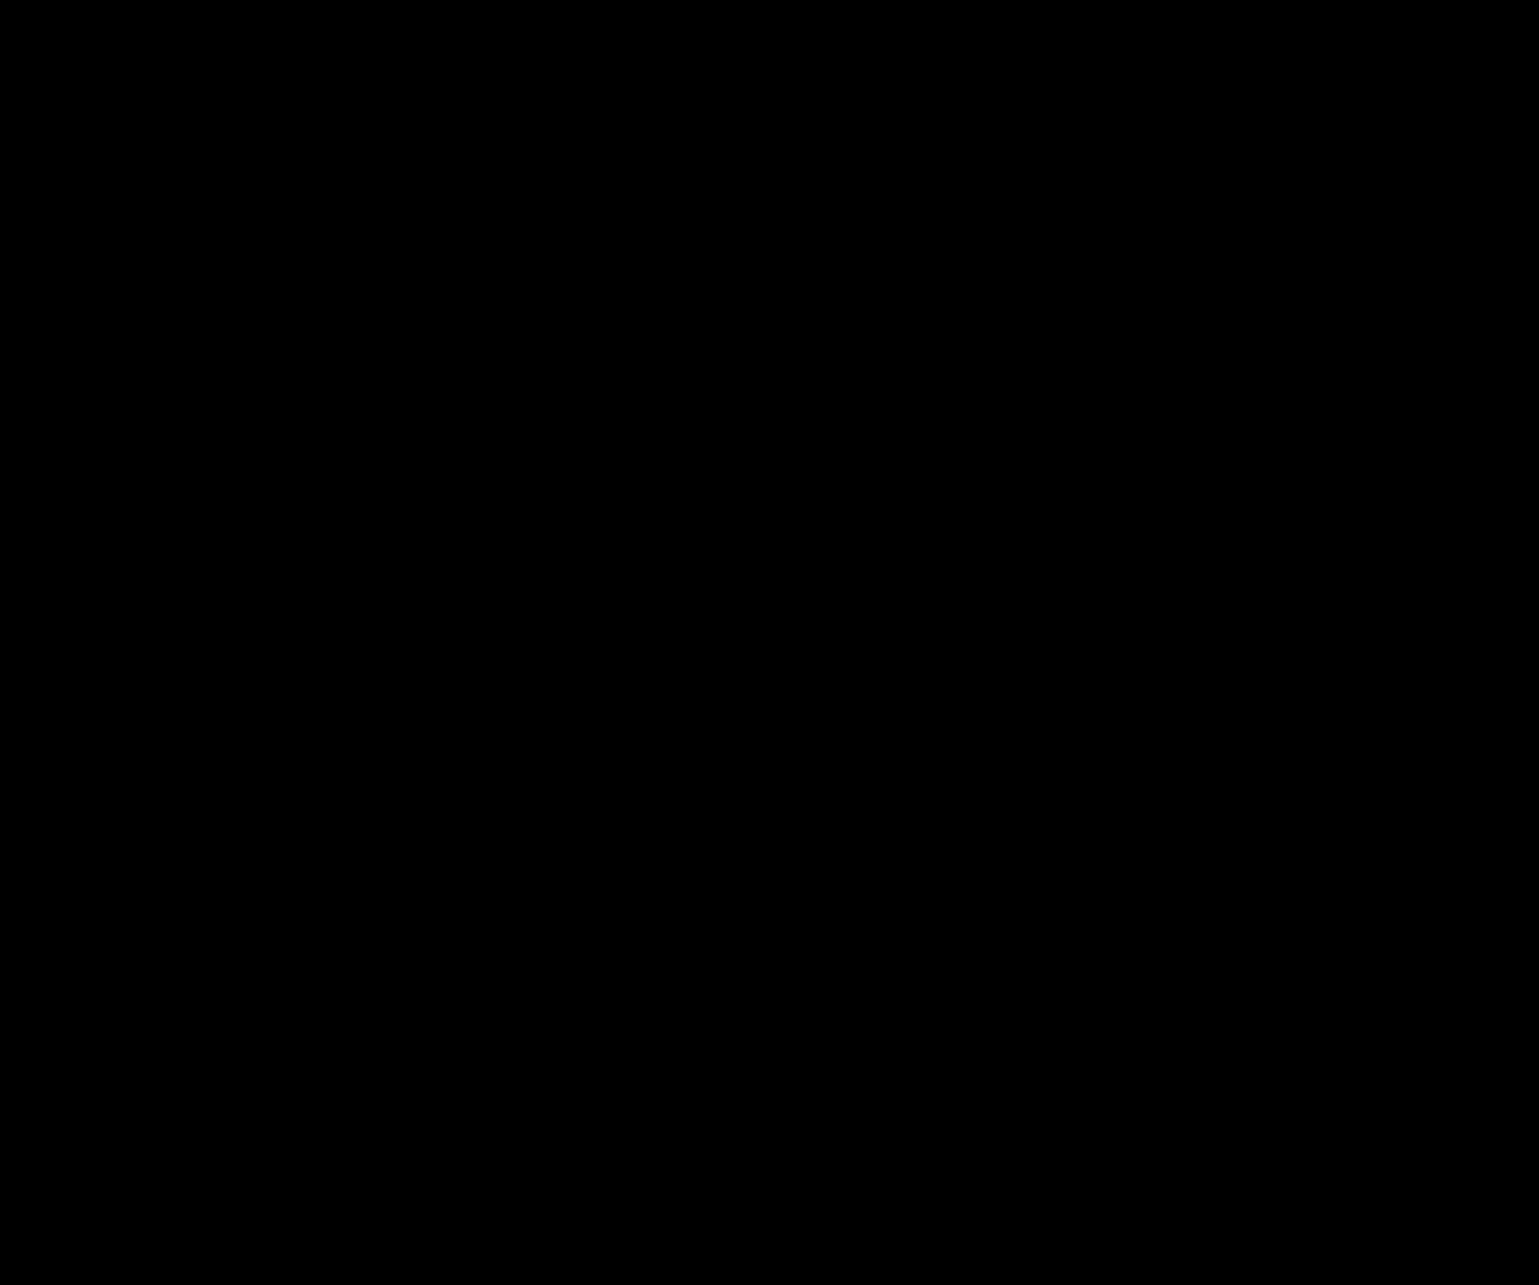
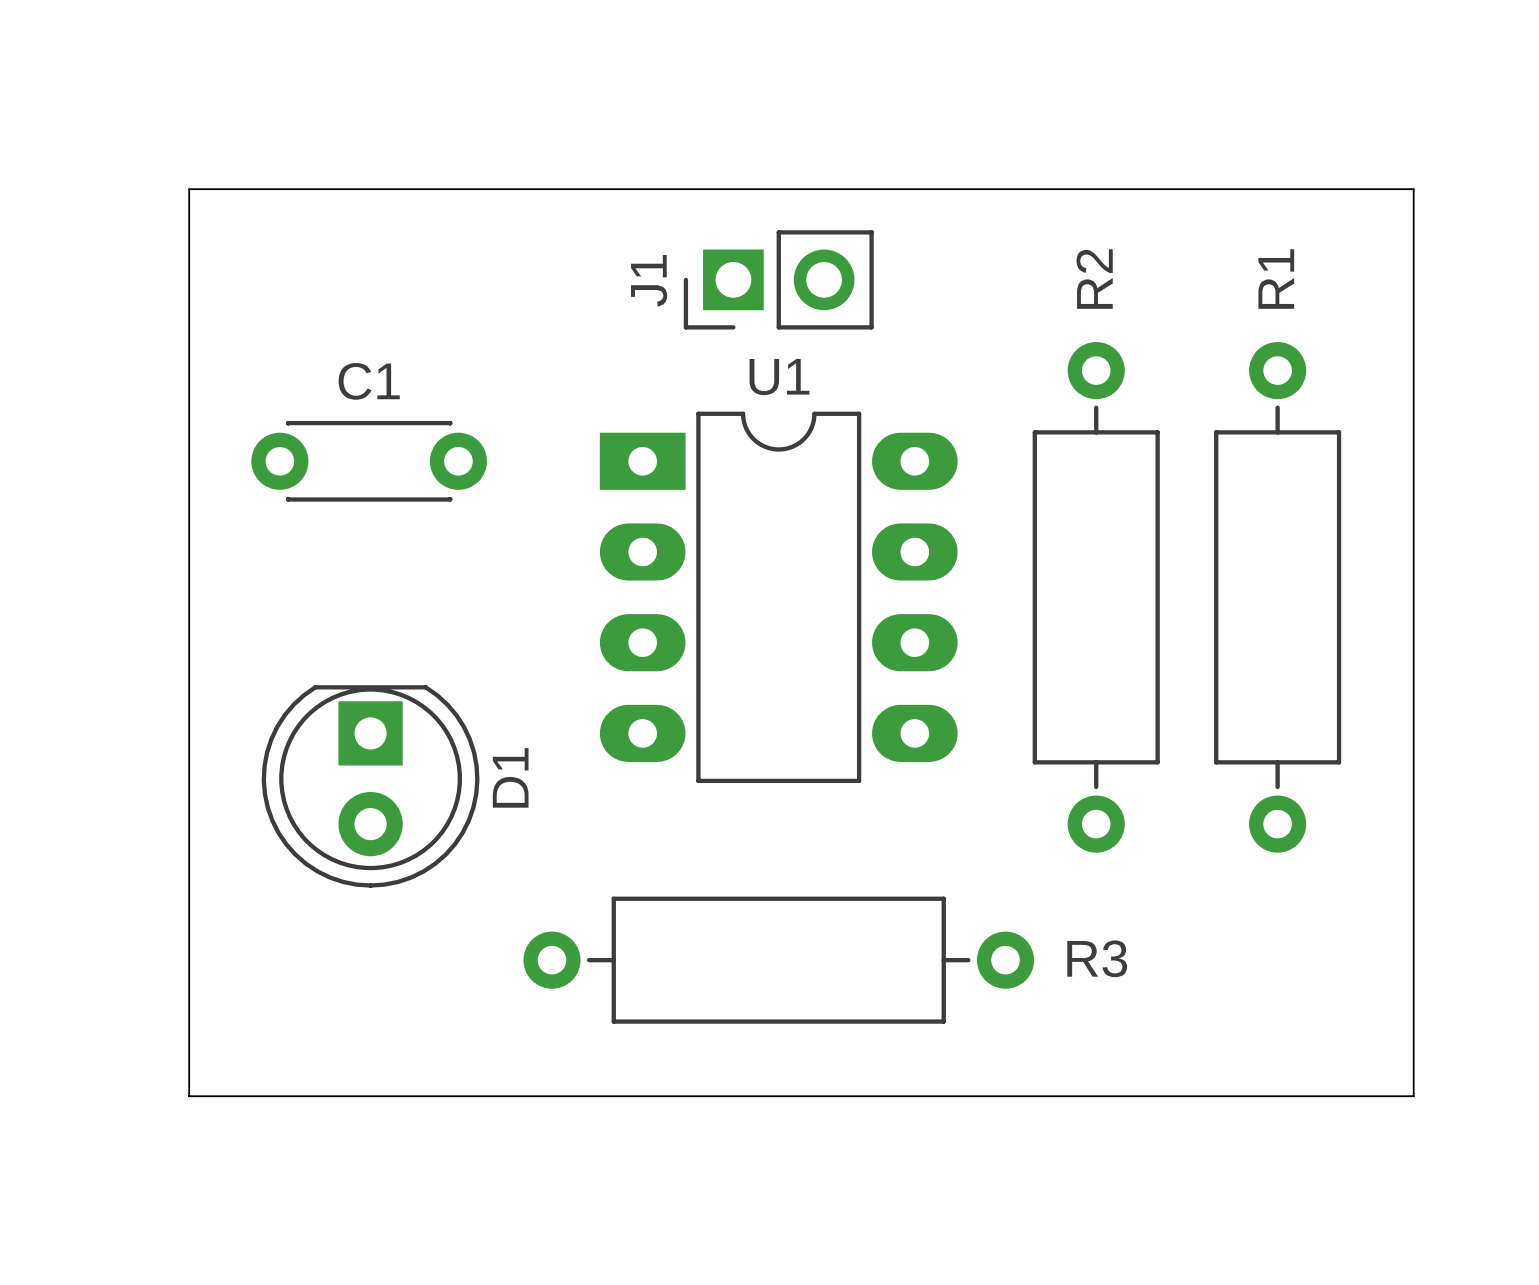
board edge: none -> (189, 189) (189, 1096) (1413, 1096) (1413, 189) (189, 189)
J1: none -> (778, 279)
C1: none -> (369, 461)
U1: none -> (778, 597)
R2: none -> (1096, 597)
R1: none -> (1277, 597)
D1: none -> (370, 786)
R3: none -> (778, 960)

